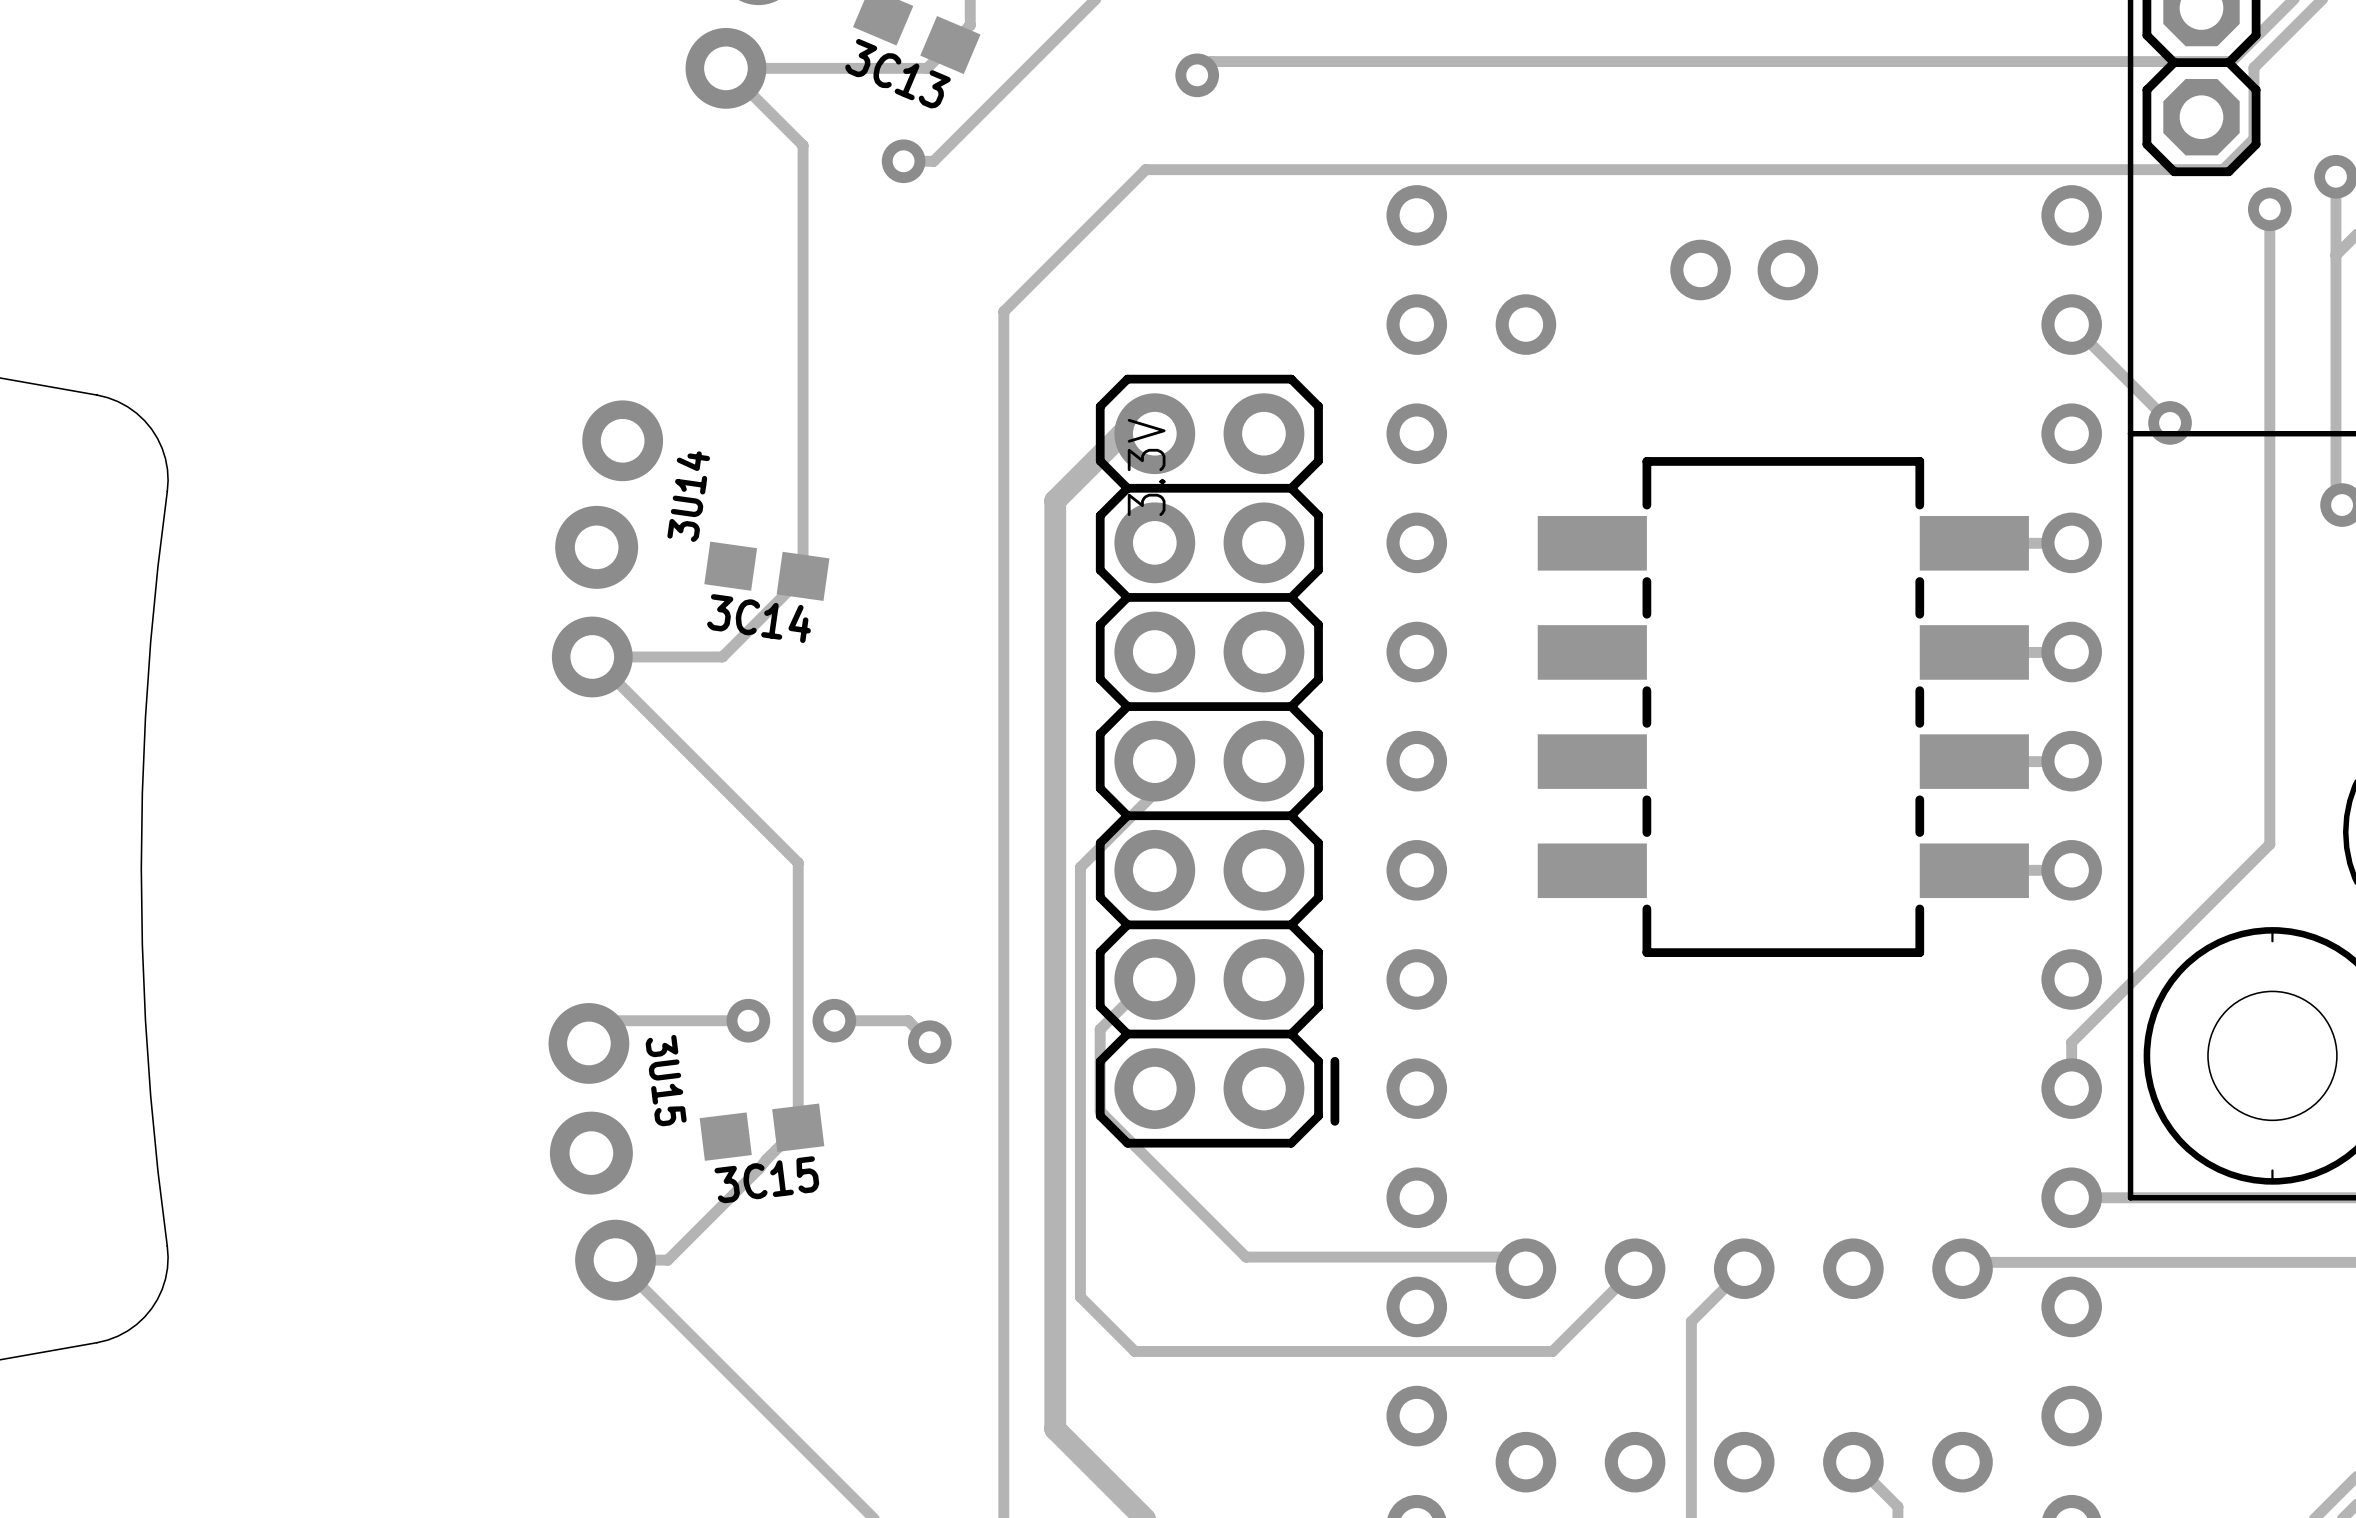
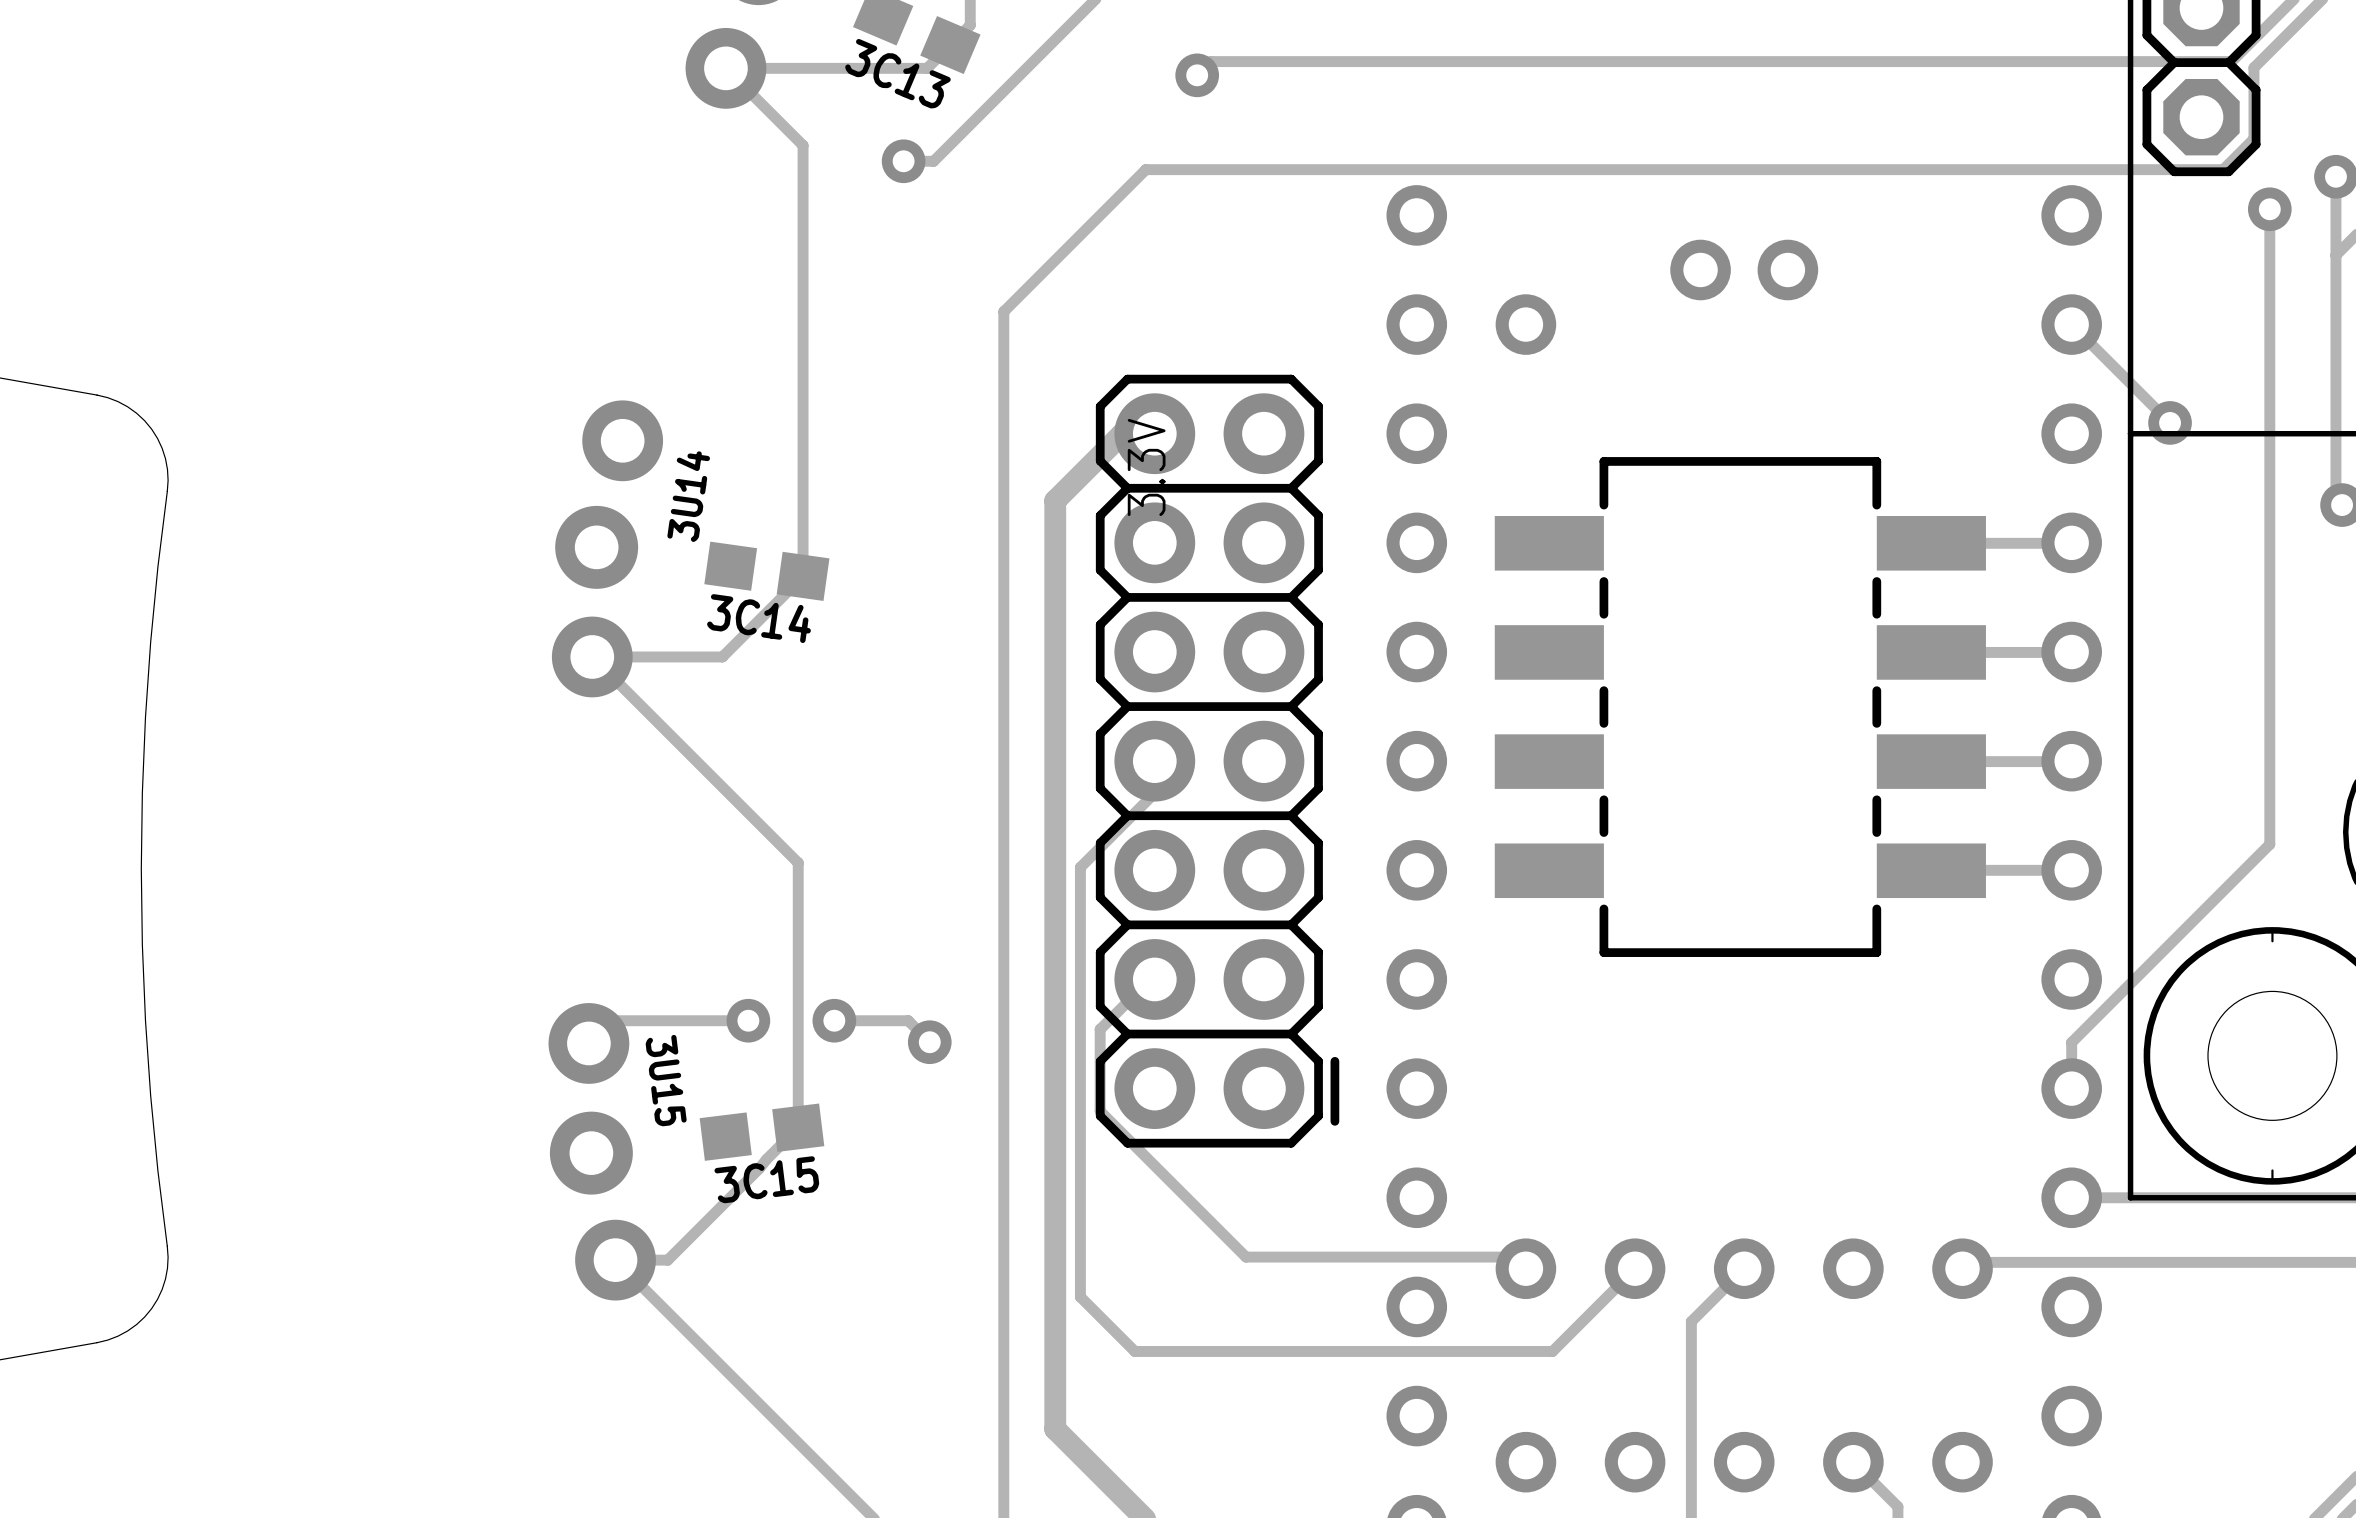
part position: (1783, 707) -> (1740, 707)

